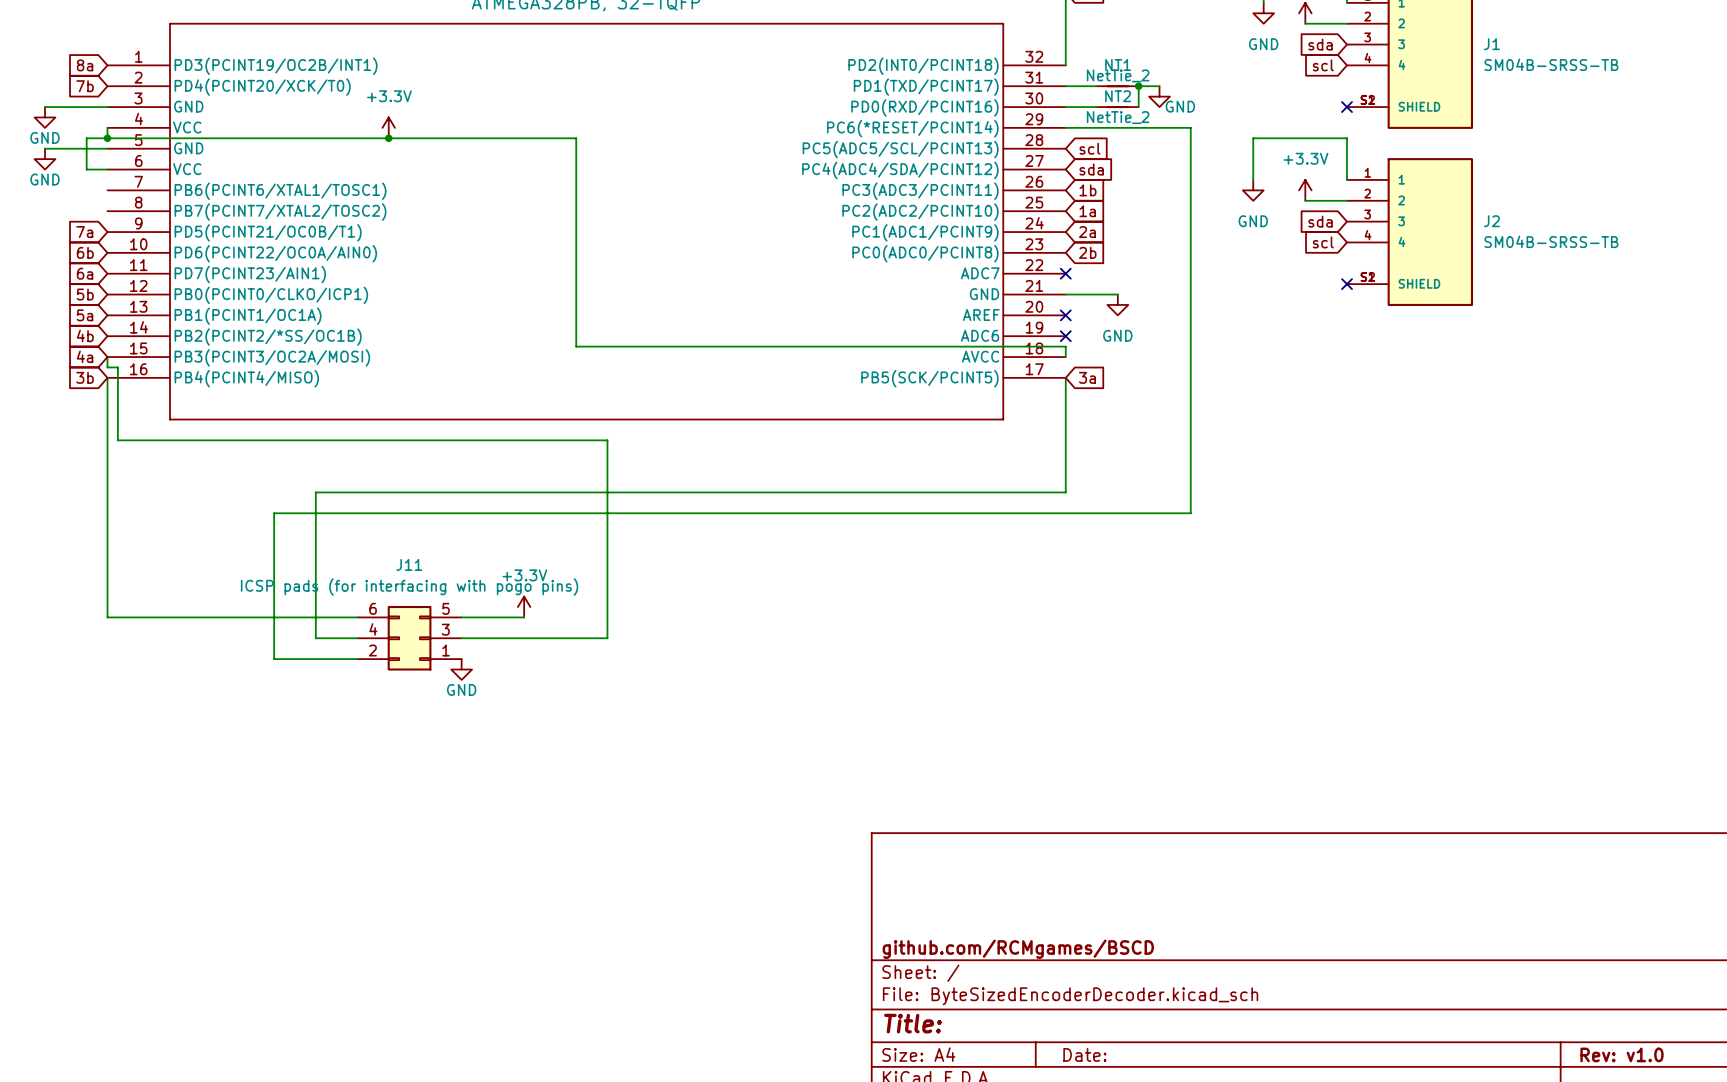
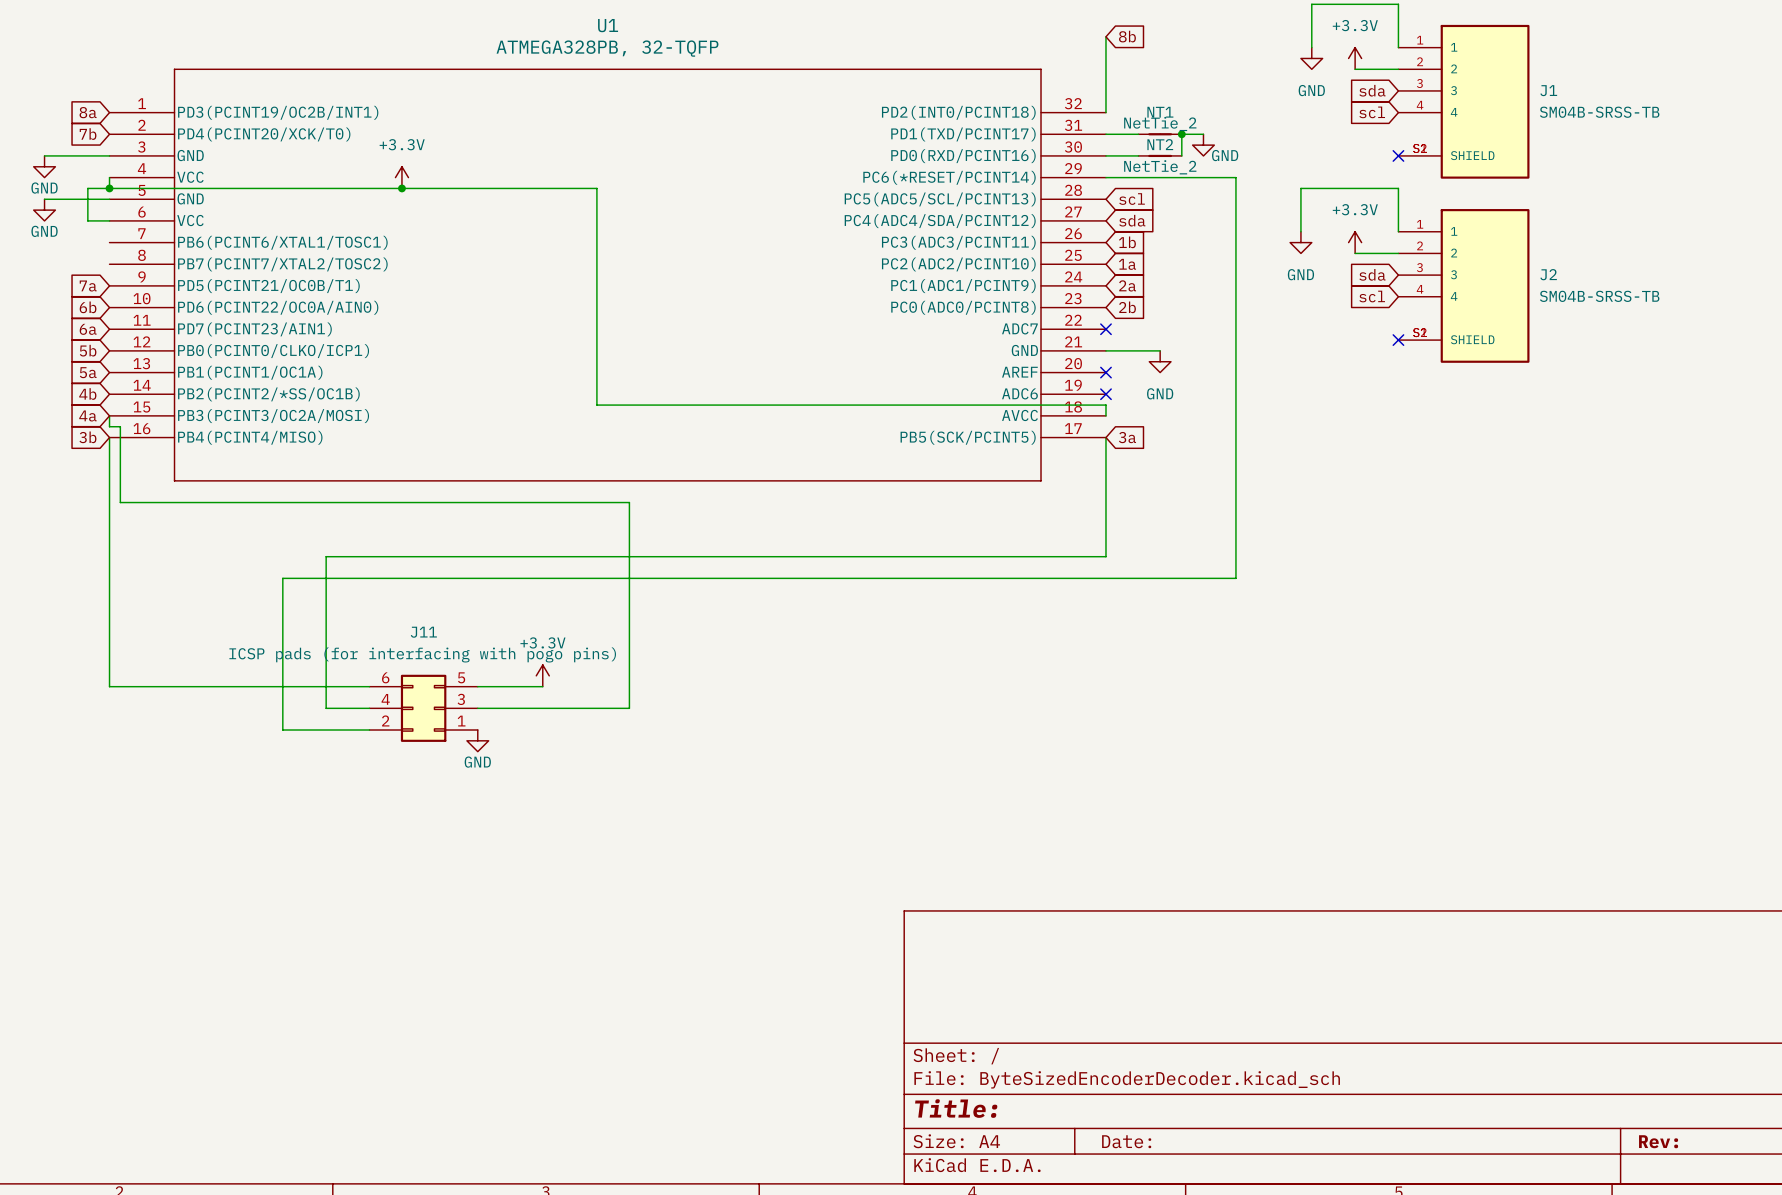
title block: github.com/RCMgames/BSCD (1018, 949) -> none
title block: Rev: v1.0 (1622, 1054) -> Rev: (1658, 1141)

